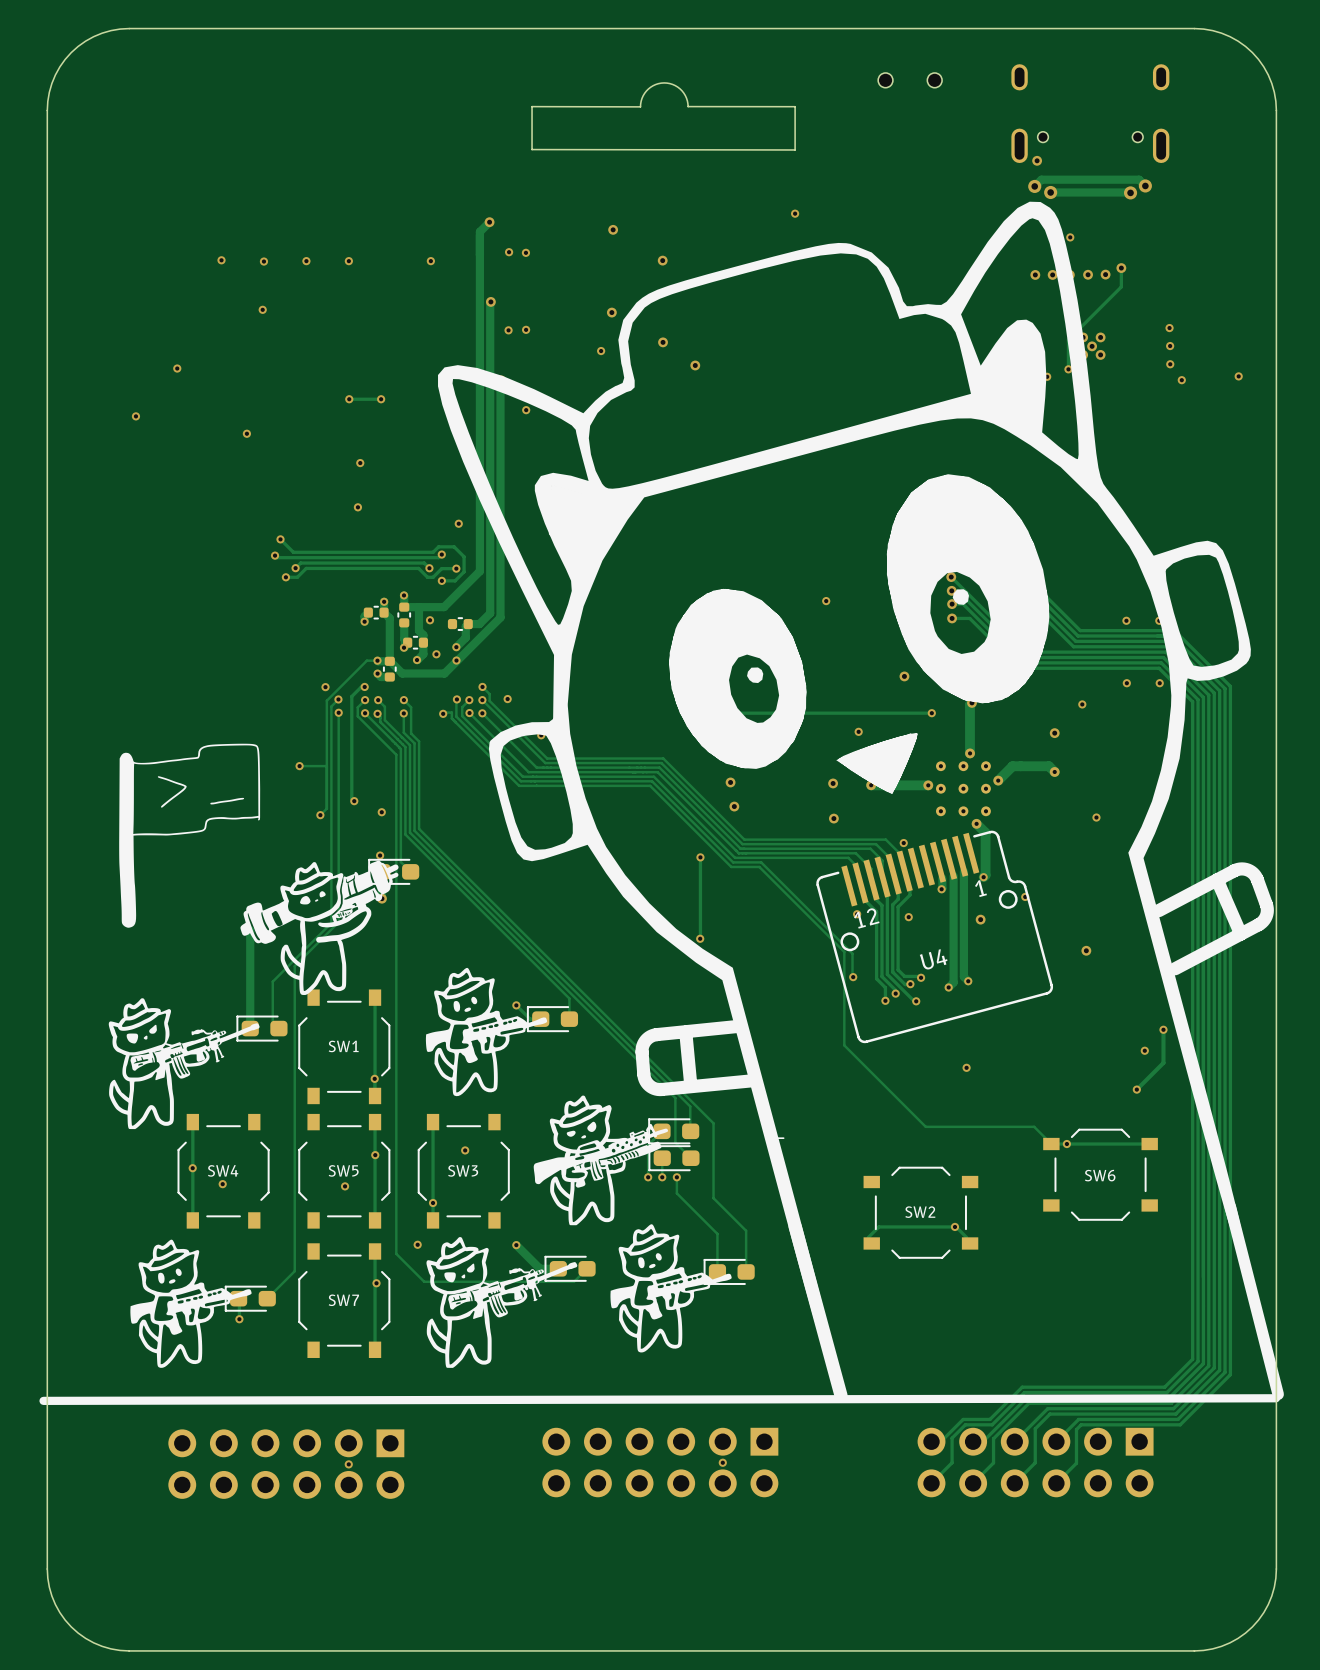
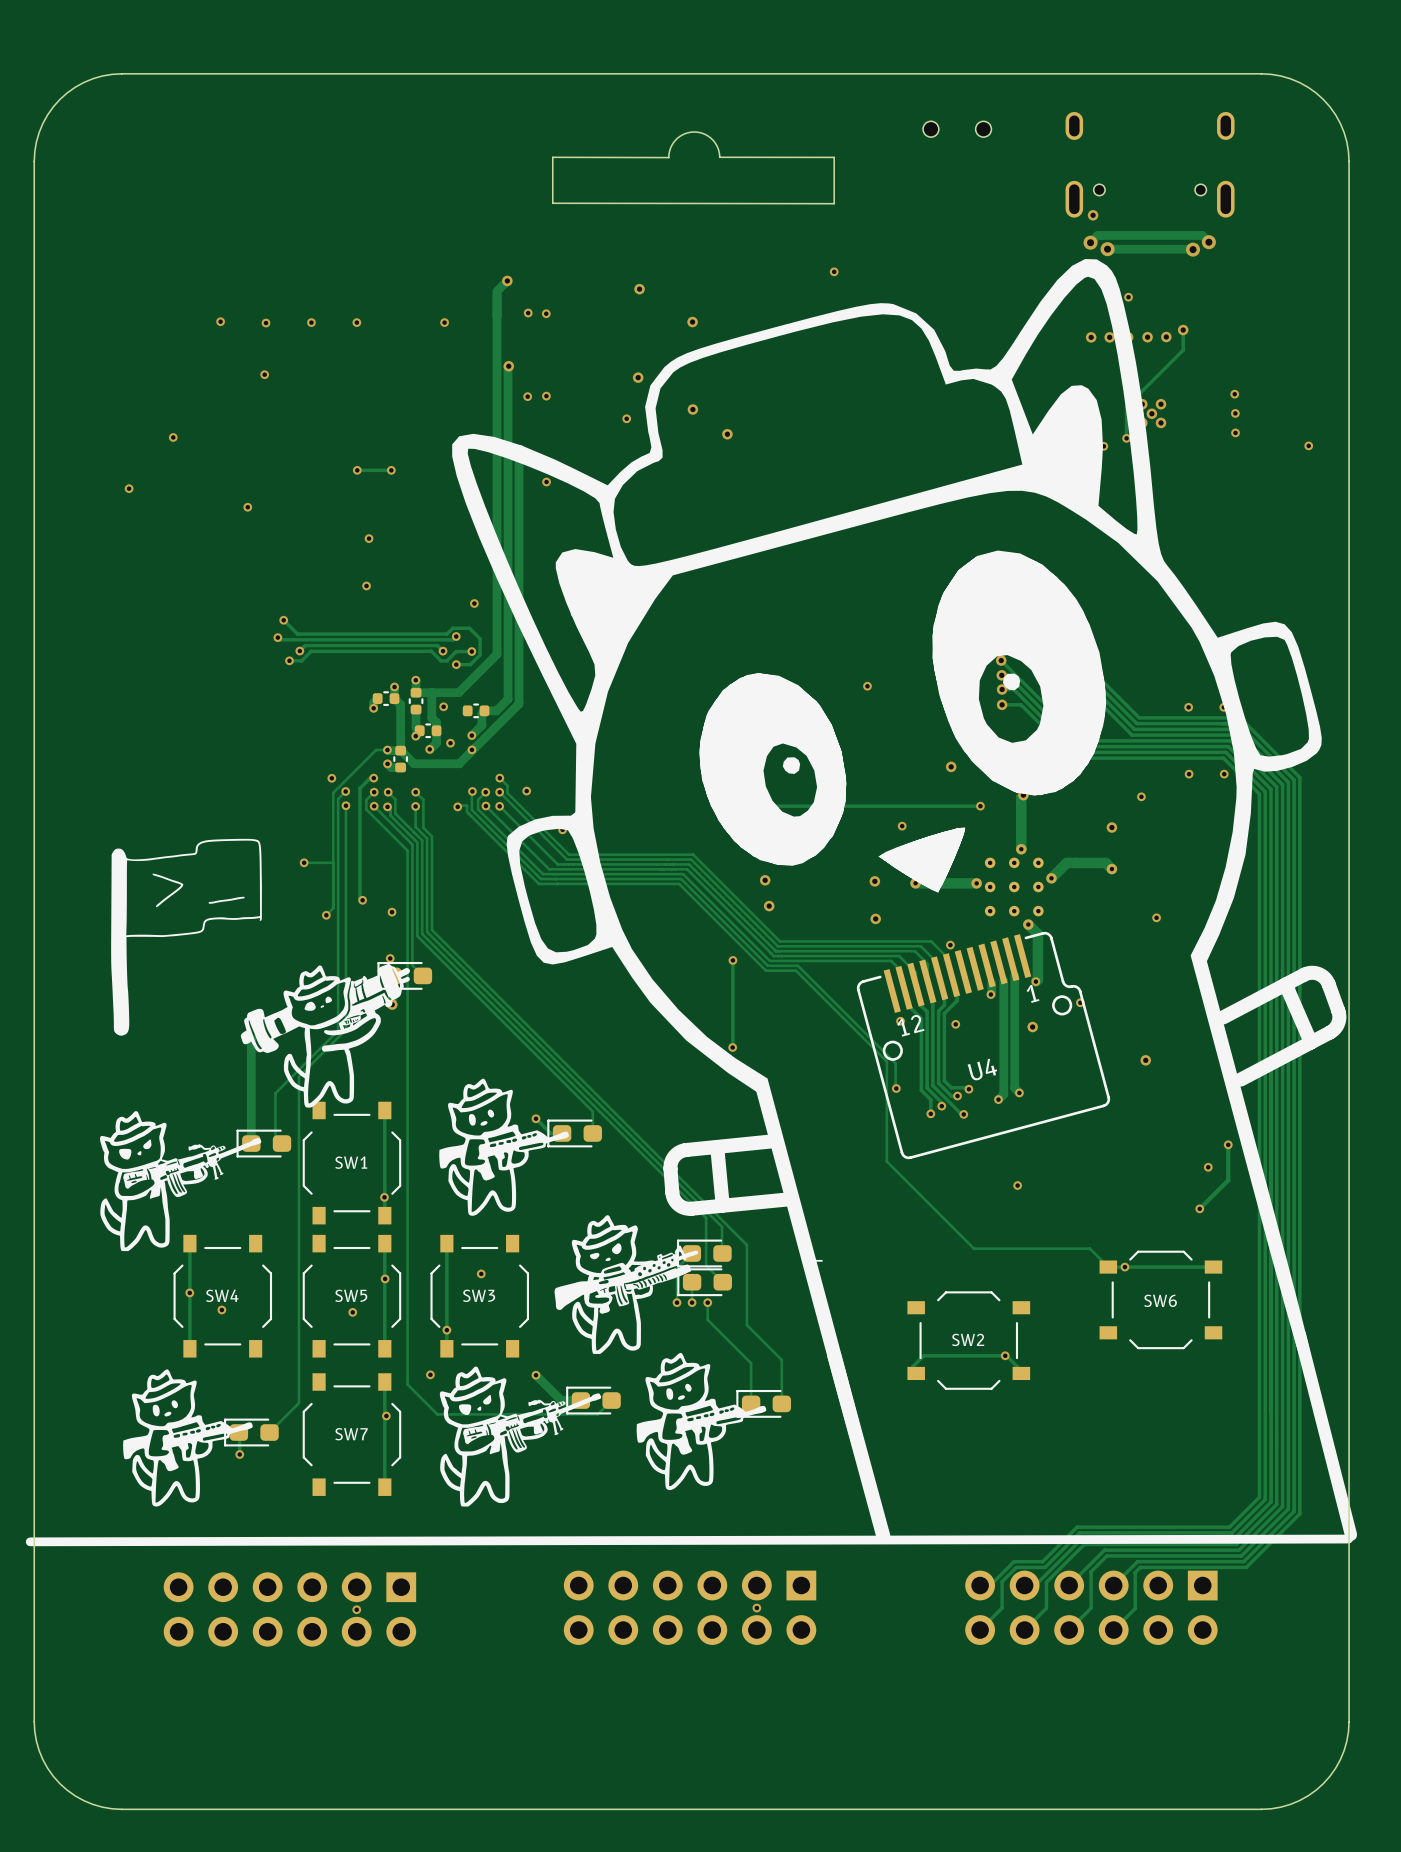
via: (1181, 380) -> none

